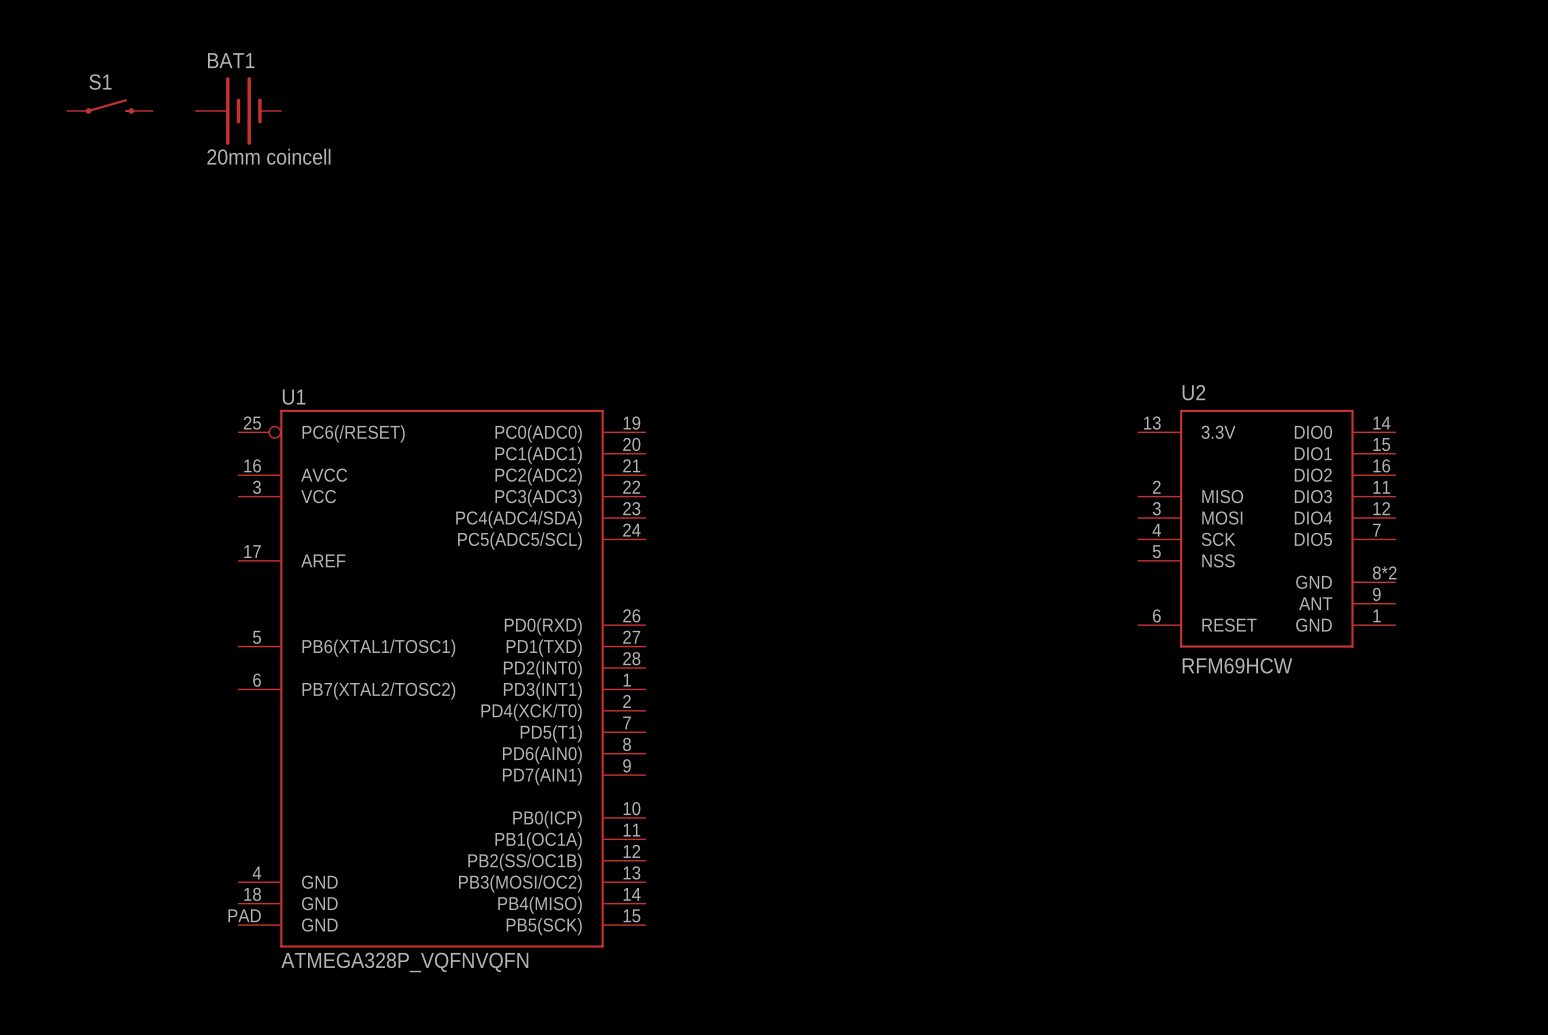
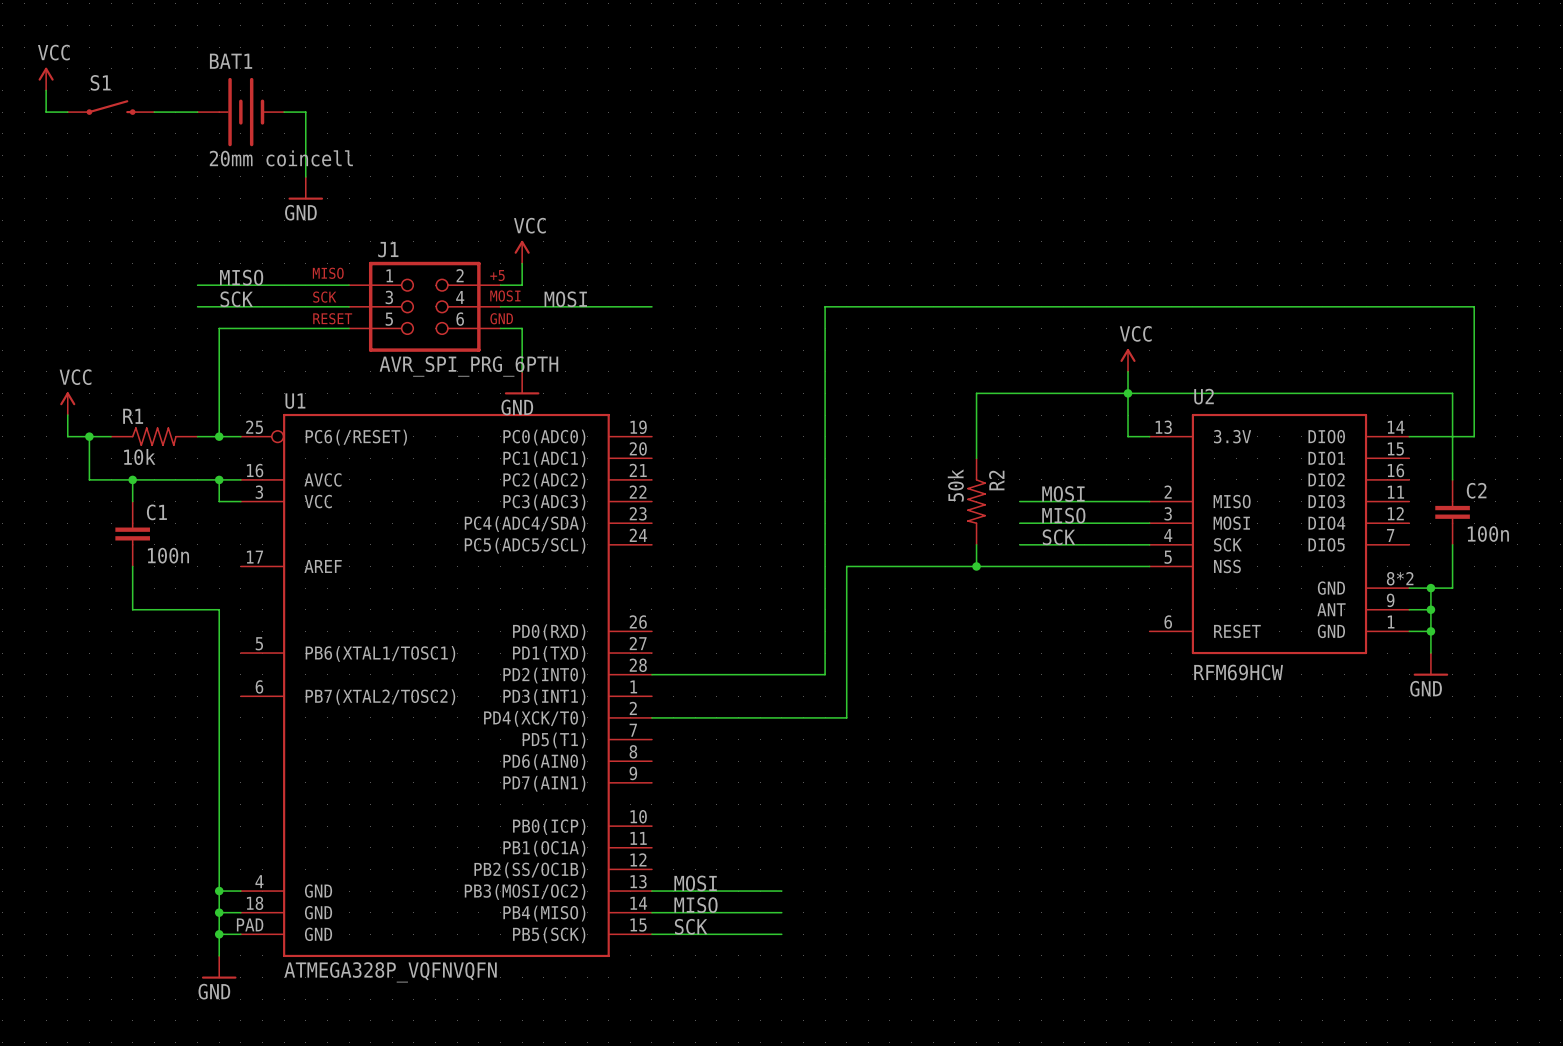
power symbol: none -> VCC (46, 79)
wire: none -> (46, 90) (46, 112) (67, 112)
wire: none -> (154, 112) (197, 112)
wire: none -> (284, 112) (305, 112) (305, 176)
power symbol: none -> GND (305, 188)
power symbol: none -> VCC (522, 252)
wire: none -> (522, 263) (522, 285) (500, 285)
label: none -> MISO (241, 277)
wire: none -> (197, 285) (349, 285)
label: none -> SCK (236, 299)
label: none -> MOSI (565, 299)
wire: none -> (197, 306) (349, 306)
J1: none -> AVR_SPI_PRG_6PTH (424, 306)
wire: none -> (500, 306) (651, 306)
wire: none -> (349, 328) (219, 328) (219, 436)
wire: none -> (500, 328) (522, 328) (522, 371)
power symbol: none -> VCC (1128, 360)
wire: none -> (1128, 371) (1128, 436) (1149, 436)
power symbol: none -> GND (522, 383)
junction: none -> (1128, 393)
power symbol: none -> VCC (67, 403)
wire: none -> (67, 415) (67, 436) (111, 436)
wire: none -> (89, 436) (89, 479) (240, 479)
junction: none -> (89, 436)
R1: none -> 10k (154, 436)
wire: none -> (197, 436) (240, 436)
junction: none -> (219, 436)
wire: none -> (1409, 436) (1474, 436) (1474, 306) (825, 306) (825, 674) (651, 674)
wire: none -> (976, 458) (976, 393) (1452, 393) (1452, 479)
wire: none -> (132, 479) (132, 501)
junction: none -> (132, 479)
wire: none -> (219, 479) (219, 501) (240, 501)
junction: none -> (219, 479)
label: none -> MOSI (1063, 494)
R2: none -> 50k (976, 501)
wire: none -> (1019, 501) (1149, 501)
C2: none -> 100n (1452, 512)
label: none -> MISO (1063, 515)
wire: none -> (1019, 523) (1149, 523)
C1: none -> 100n (132, 534)
label: none -> SCK (1058, 537)
wire: none -> (976, 544) (976, 566)
wire: none -> (1019, 544) (1149, 544)
wire: none -> (1452, 544) (1452, 588) (1409, 588)
wire: none -> (132, 566) (132, 609) (219, 609) (219, 955)
junction: none -> (976, 566)
wire: none -> (1149, 566) (846, 566) (846, 717) (651, 717)
wire: none -> (1430, 588) (1430, 653)
junction: none -> (1430, 588)
wire: none -> (1409, 609) (1430, 609)
junction: none -> (1430, 609)
wire: none -> (1409, 631) (1430, 631)
junction: none -> (1430, 631)
power symbol: none -> GND (1430, 664)
label: none -> MOSI (695, 883)
wire: none -> (219, 891) (240, 891)
junction: none -> (219, 891)
wire: none -> (651, 891) (781, 891)
label: none -> MISO (695, 905)
wire: none -> (219, 912) (240, 912)
junction: none -> (219, 912)
wire: none -> (651, 912) (781, 912)
label: none -> SCK (691, 926)
wire: none -> (219, 934) (240, 934)
junction: none -> (219, 934)
wire: none -> (651, 934) (781, 934)
power symbol: none -> GND (219, 967)

